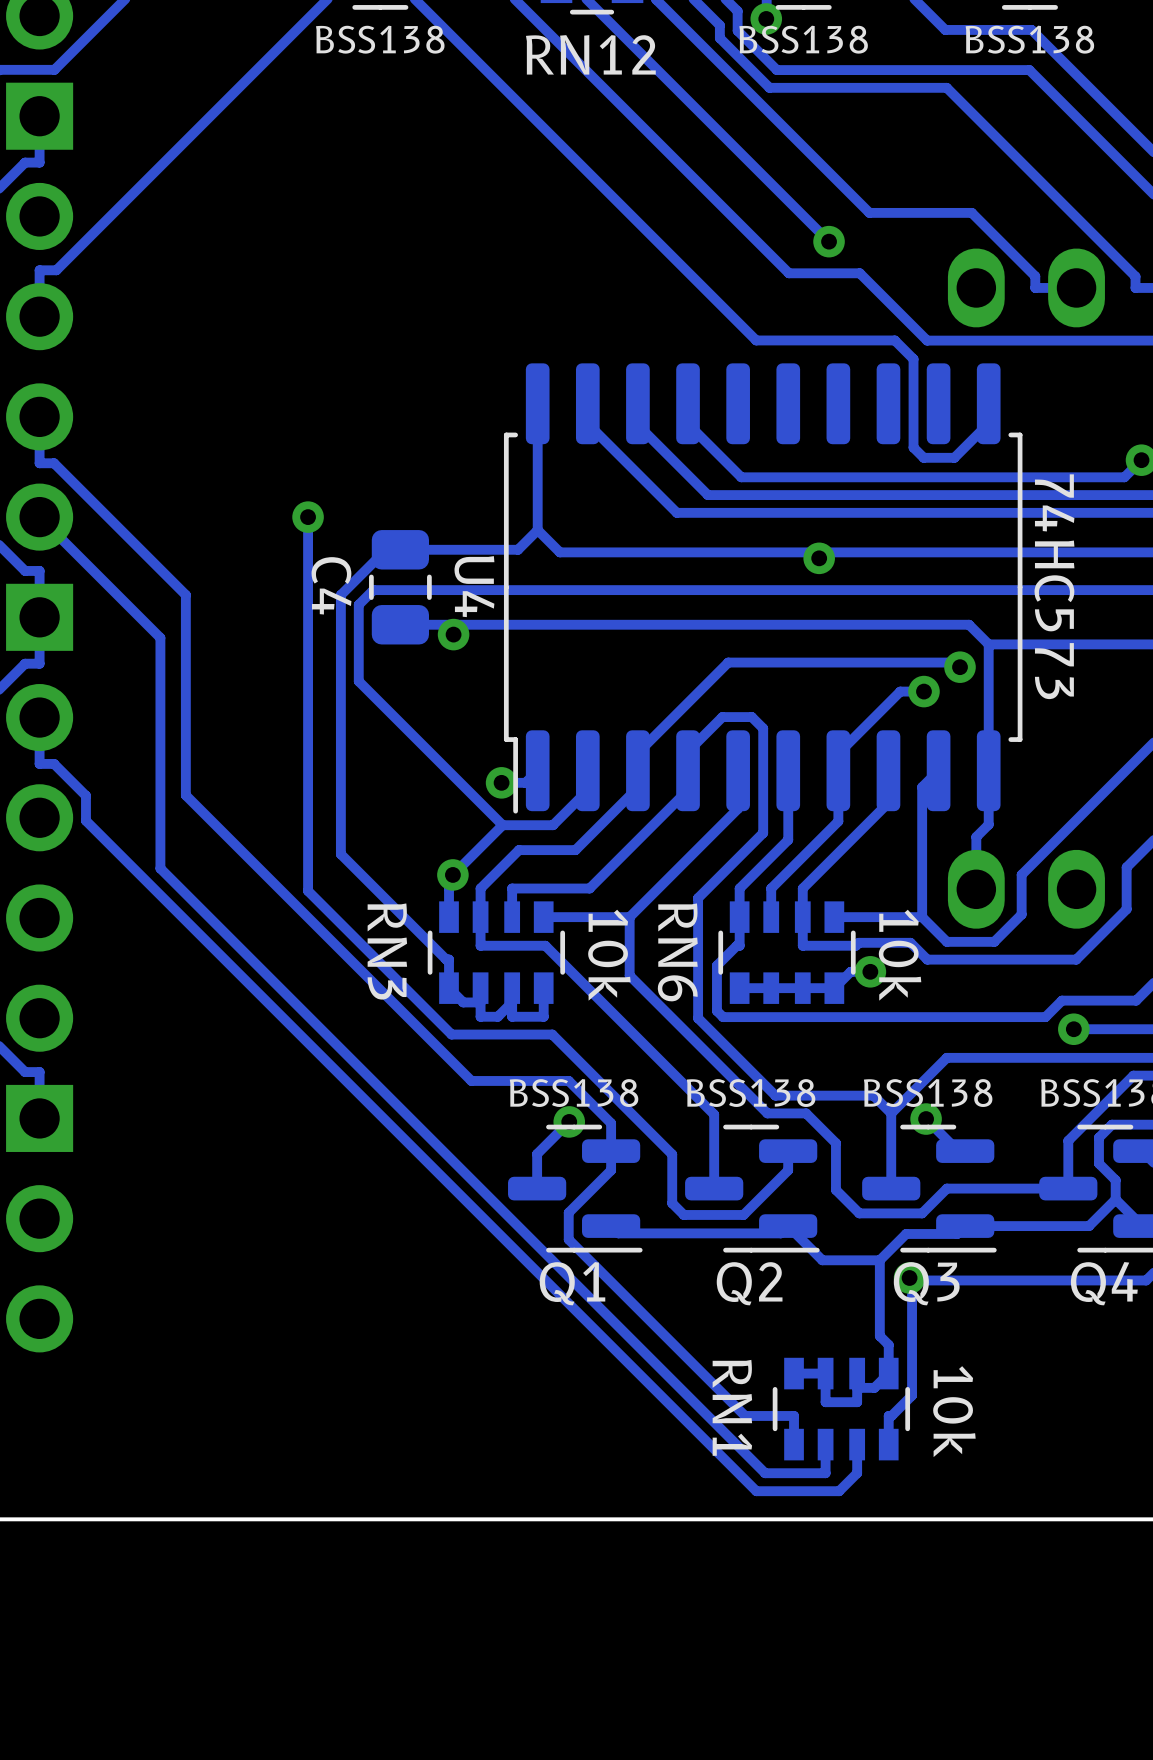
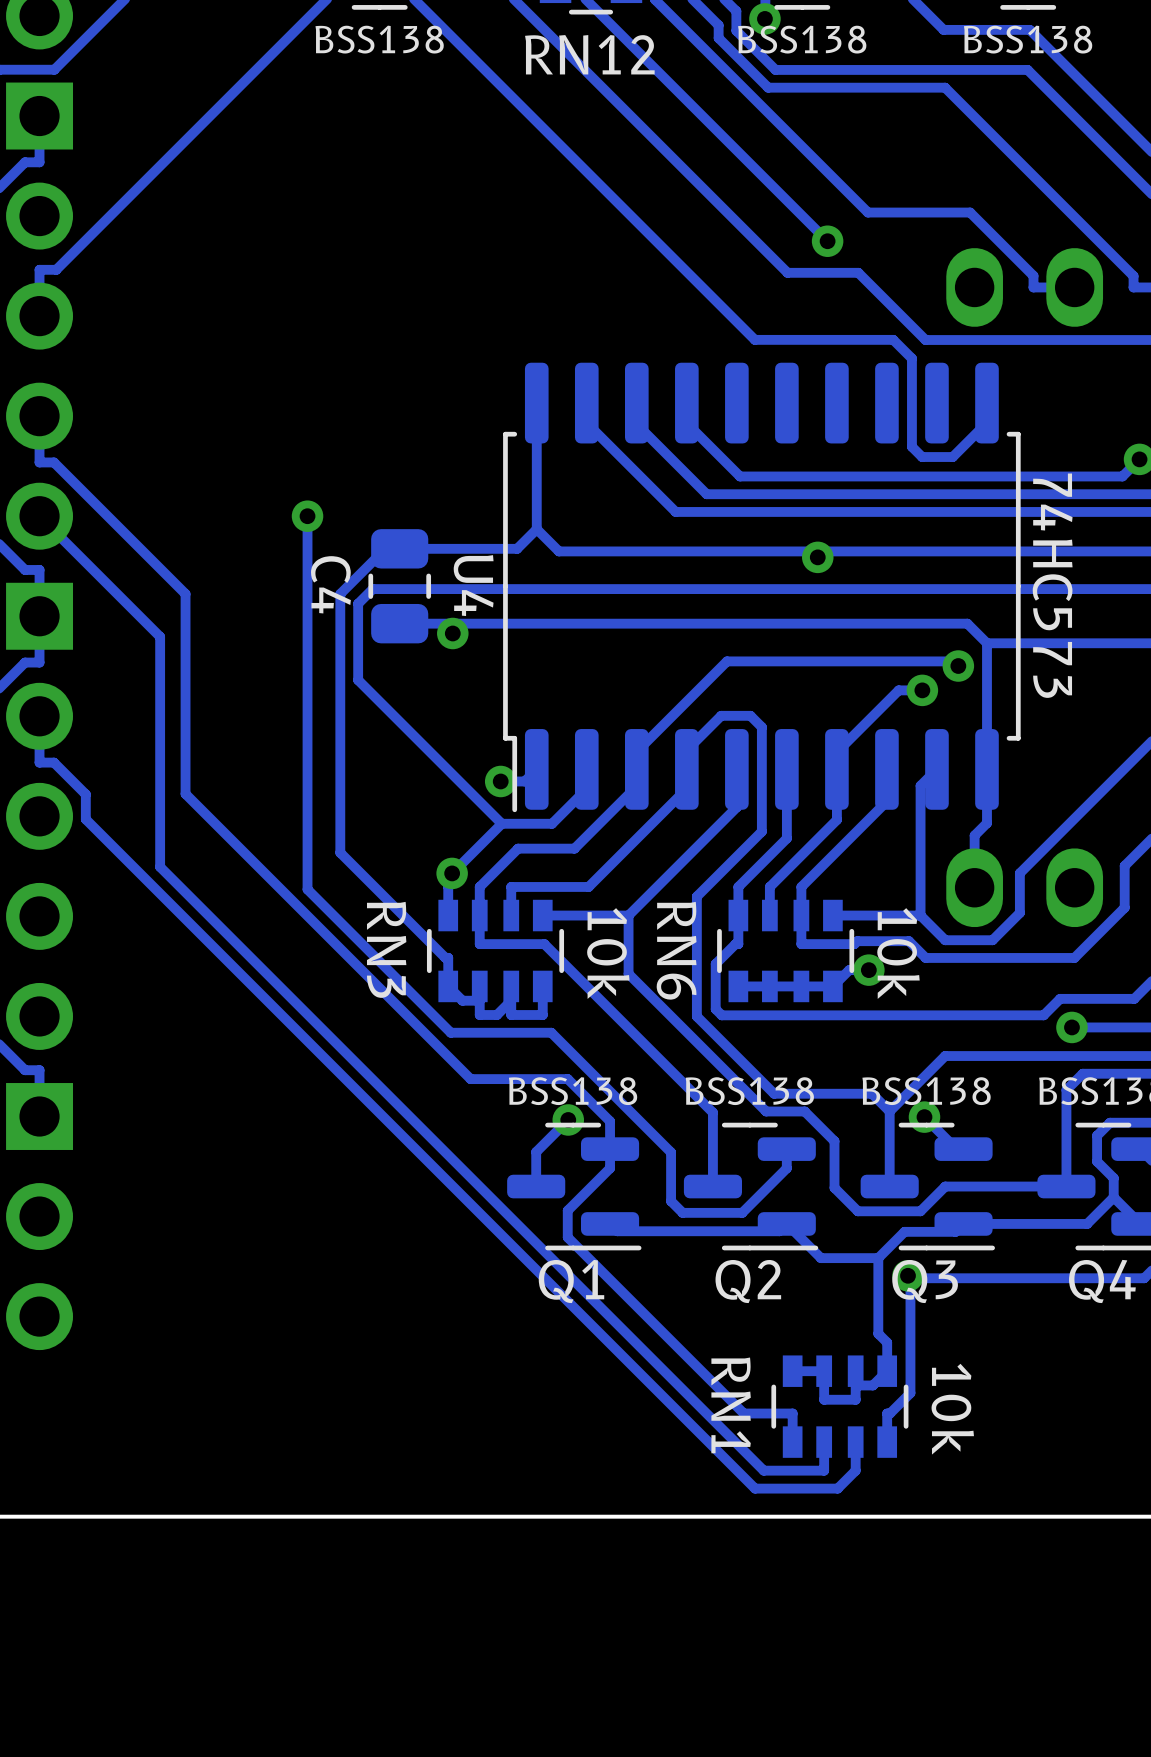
track: (1133, 1075) (1068, 1140) -> (1131, 1073) (1082, 1073) (1066, 1090) (1066, 1138)

